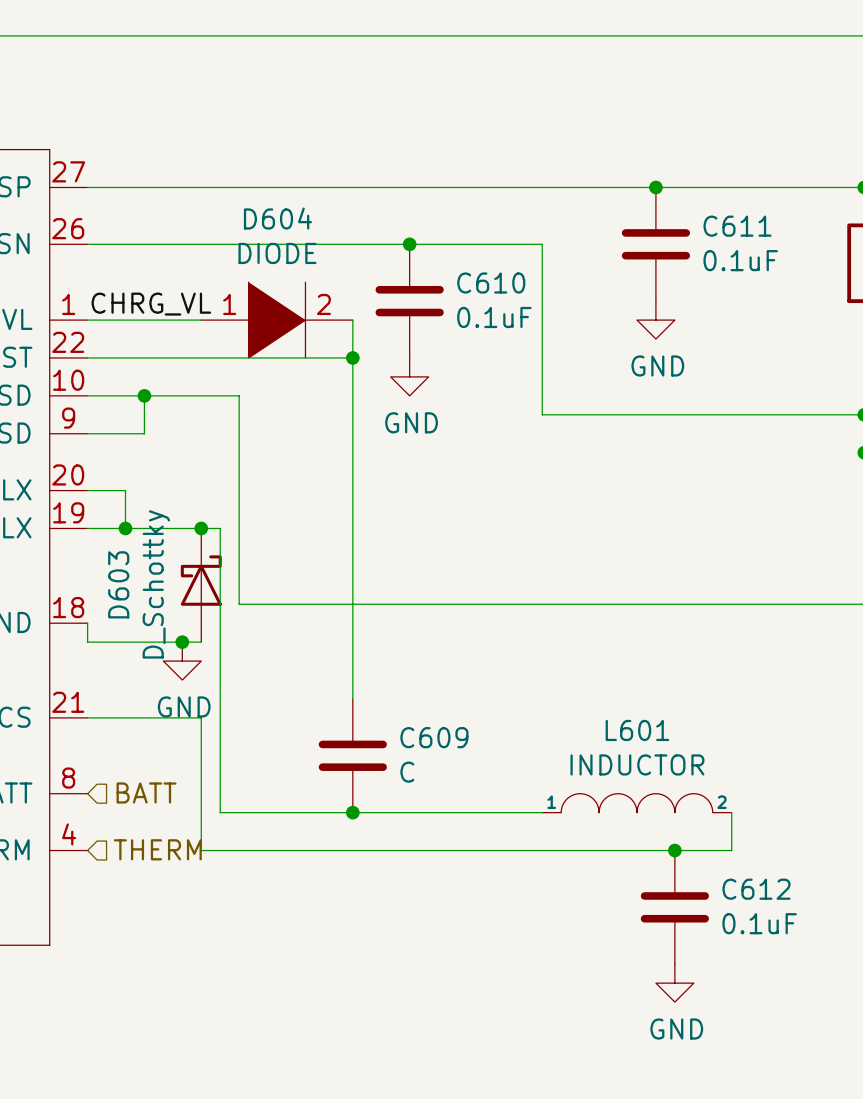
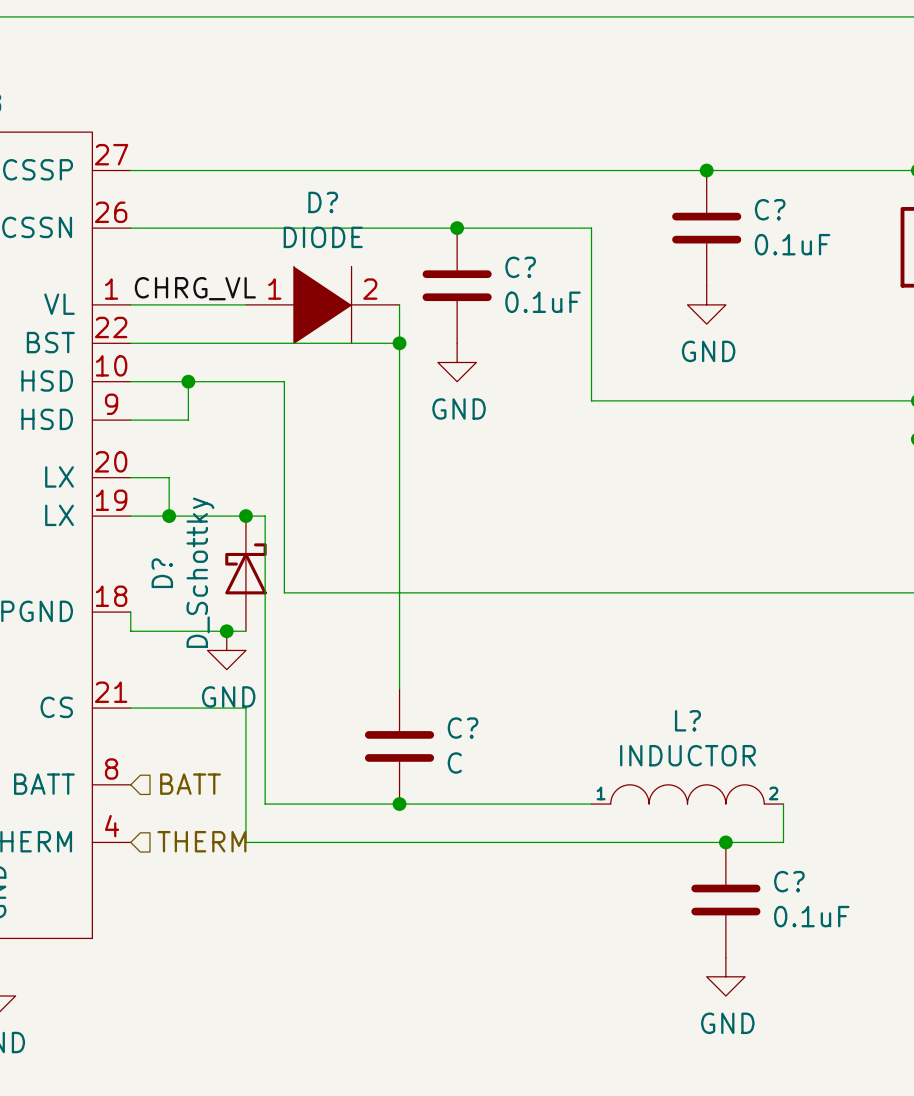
D604 name: D604 (277, 218) -> D? (323, 202)
C611 name: C611 (737, 226) -> C? (770, 209)
C610 name: C610 (491, 283) -> C? (520, 267)
D603 name: D603 (118, 584) -> D? (162, 573)
L601 name: L601 (637, 730) -> L? (687, 720)
C609 name: C609 (434, 737) -> C? (463, 728)
C612 name: C612 (756, 889) -> C? (789, 881)

